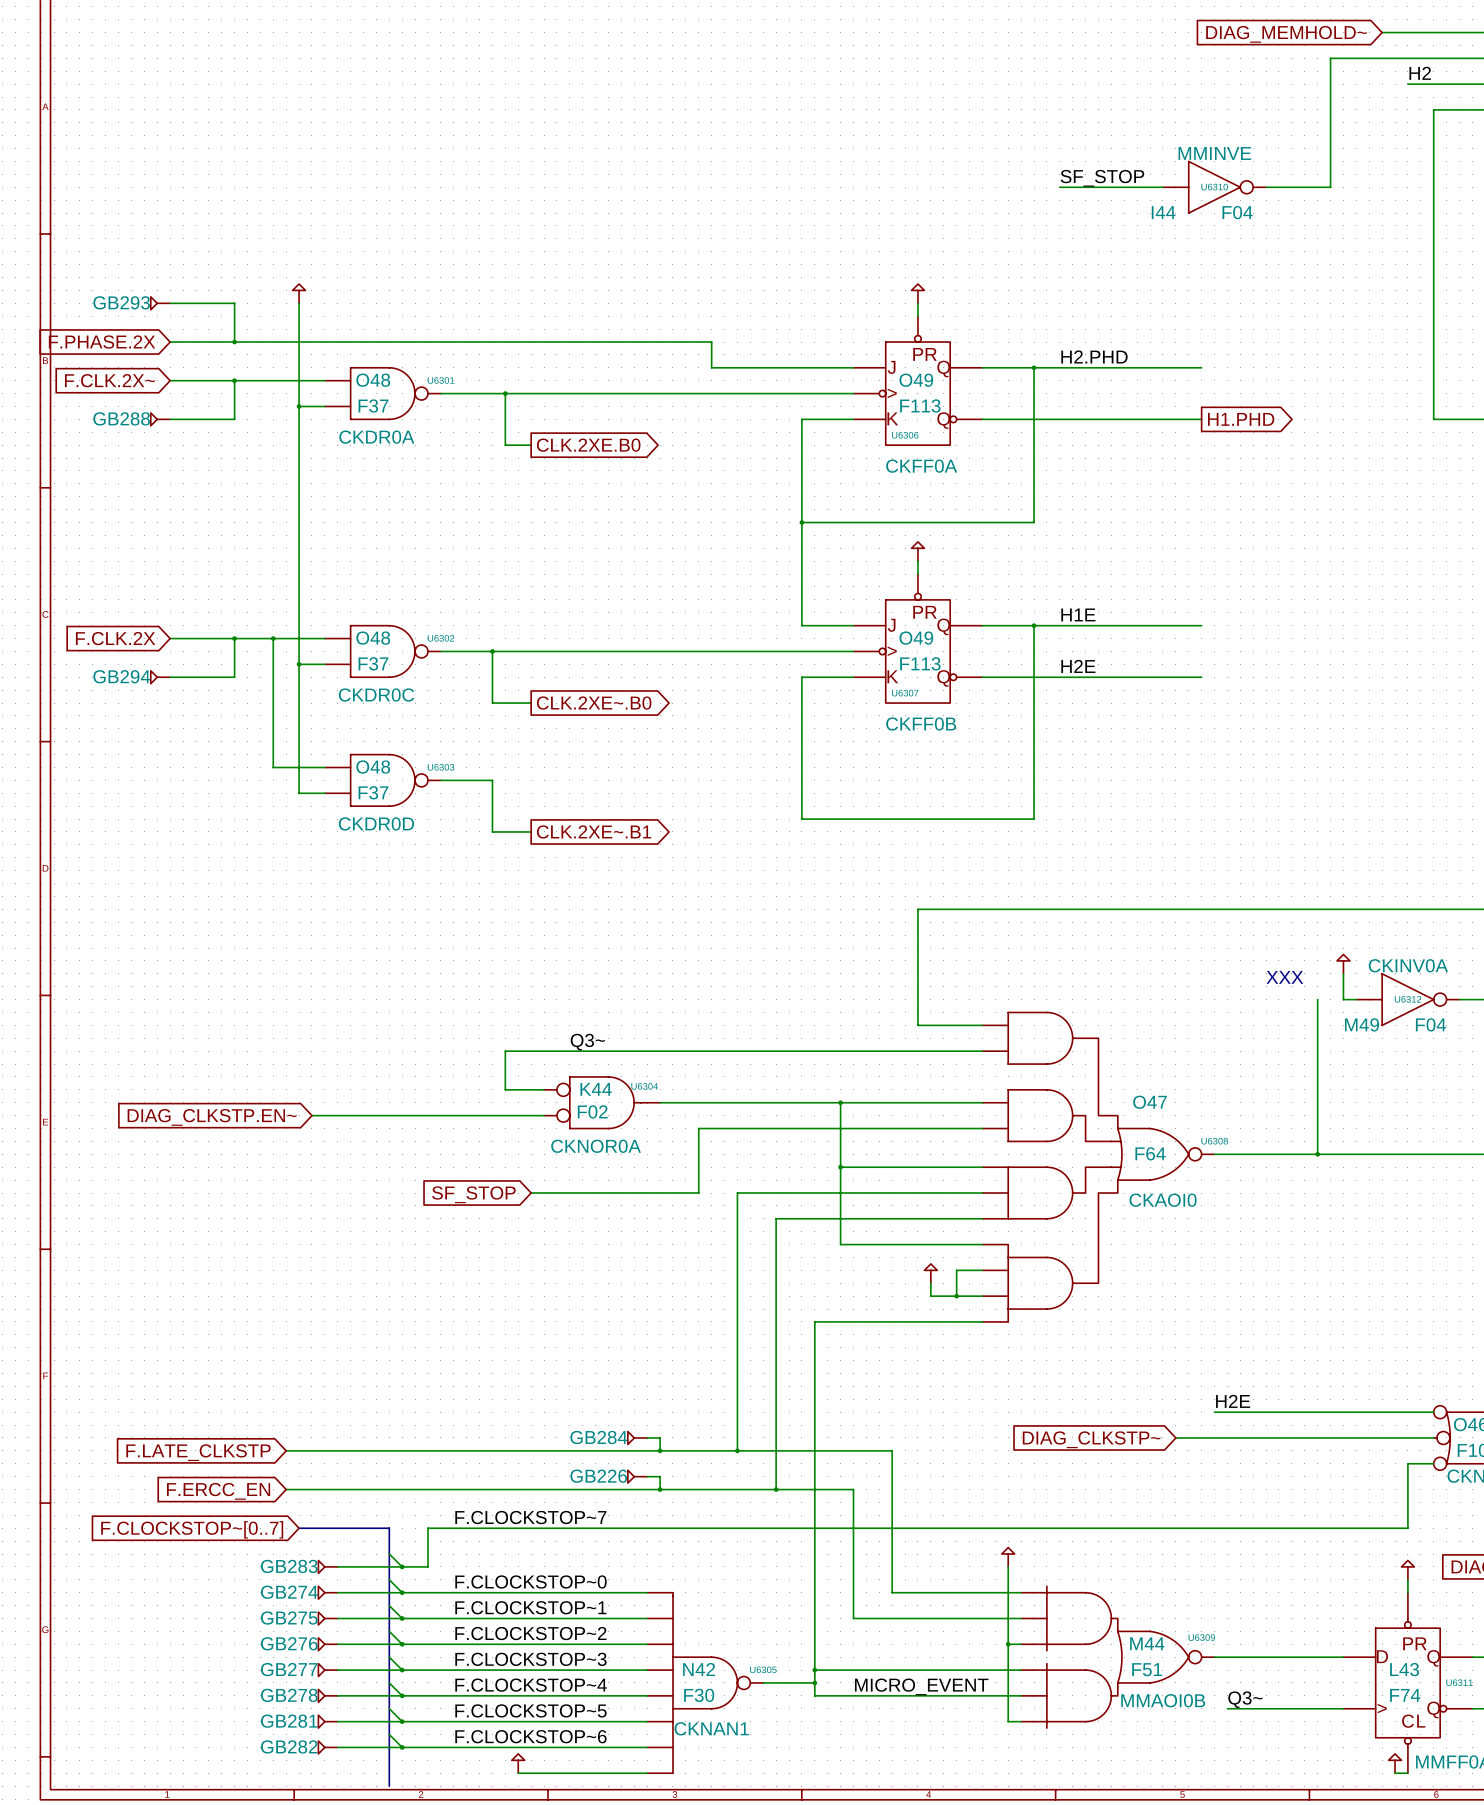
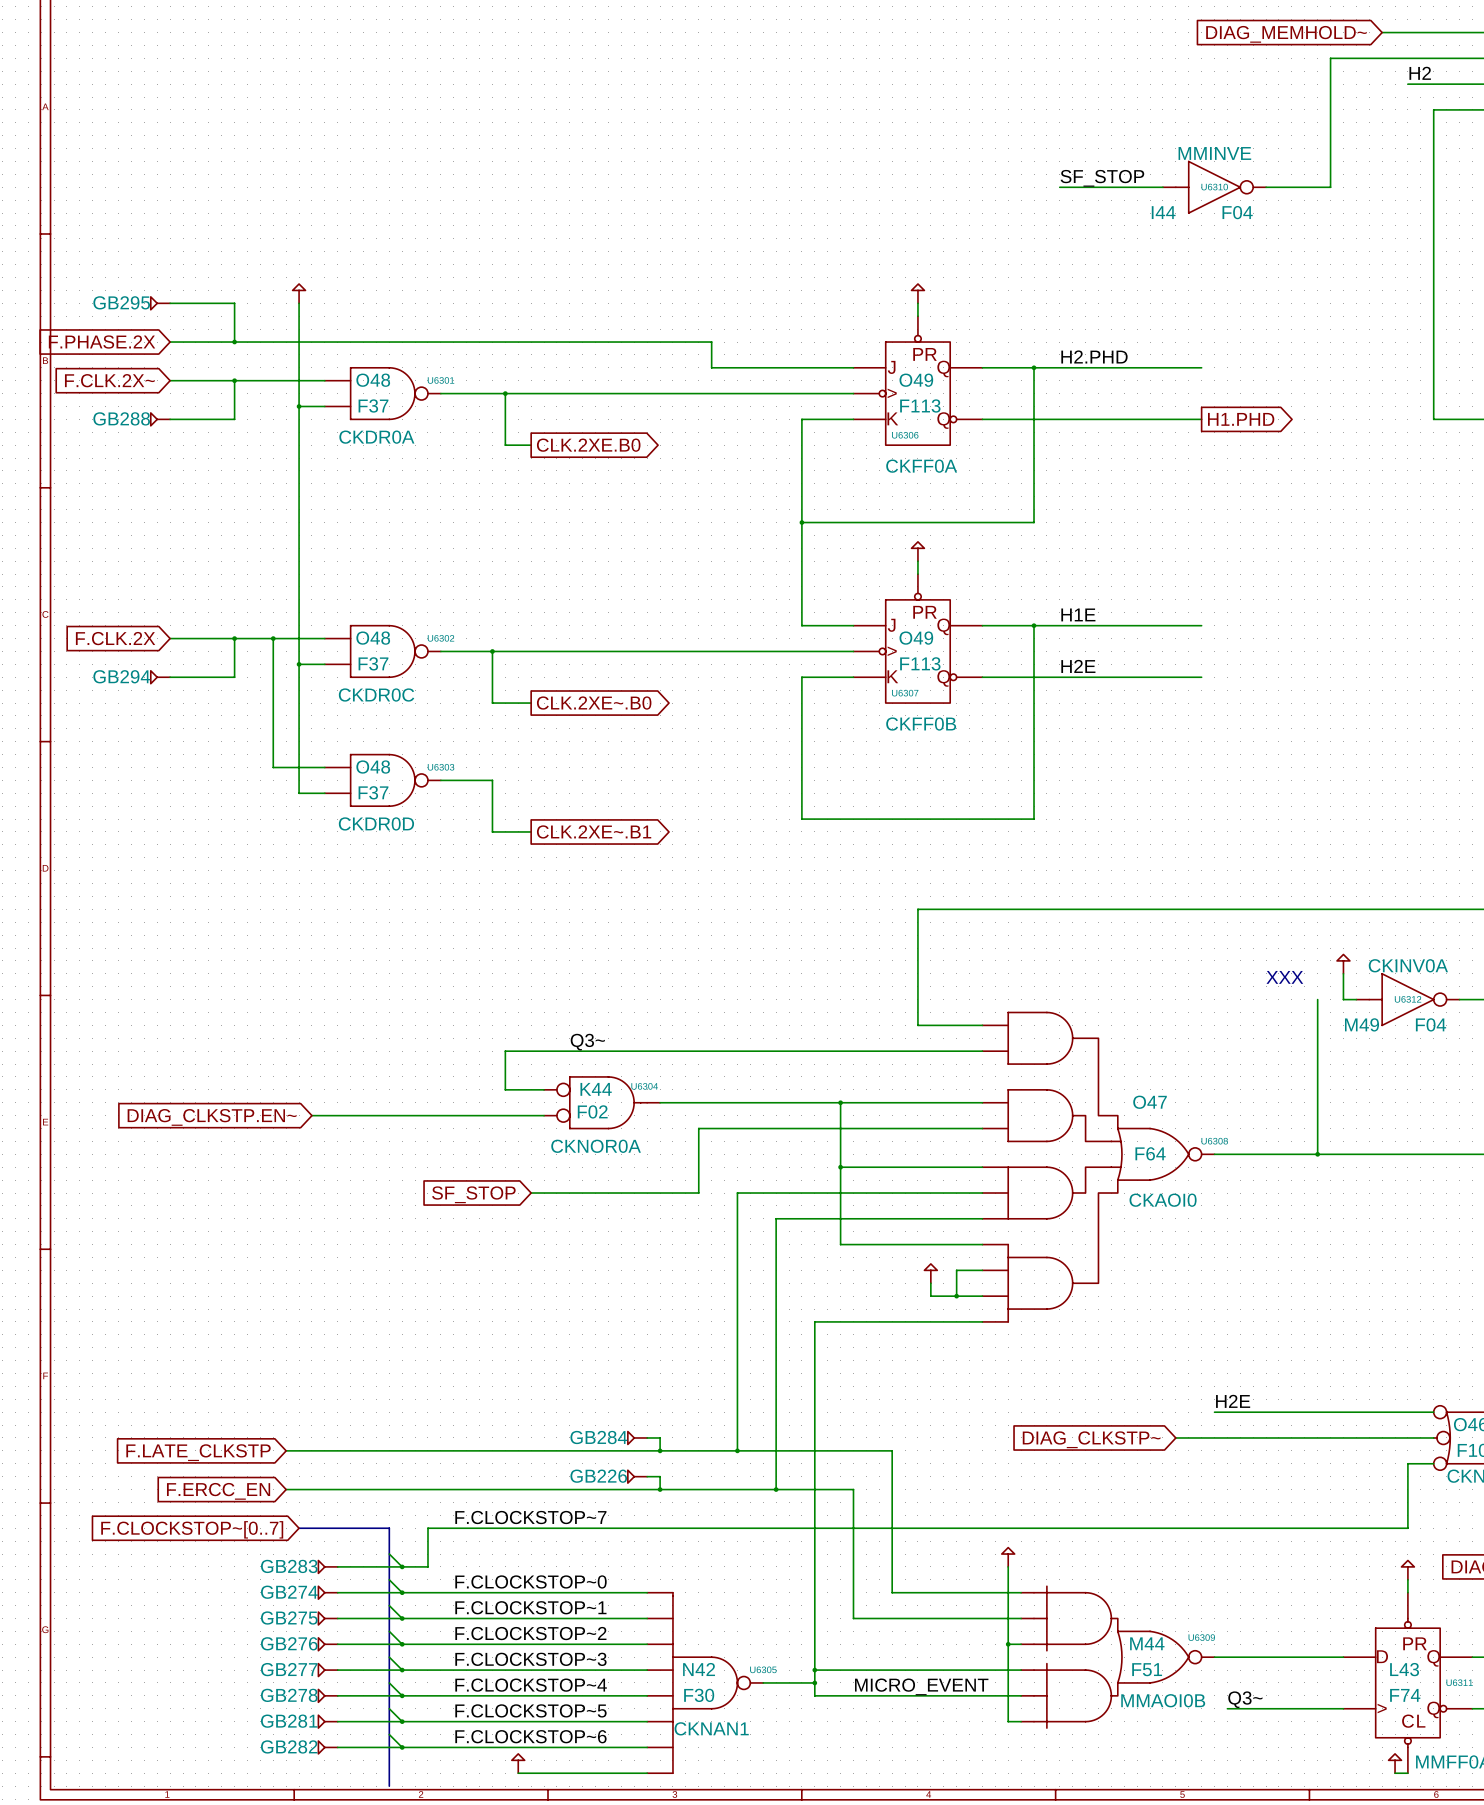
GB293 name: GB293 (121, 302) -> GB295 (121, 302)

